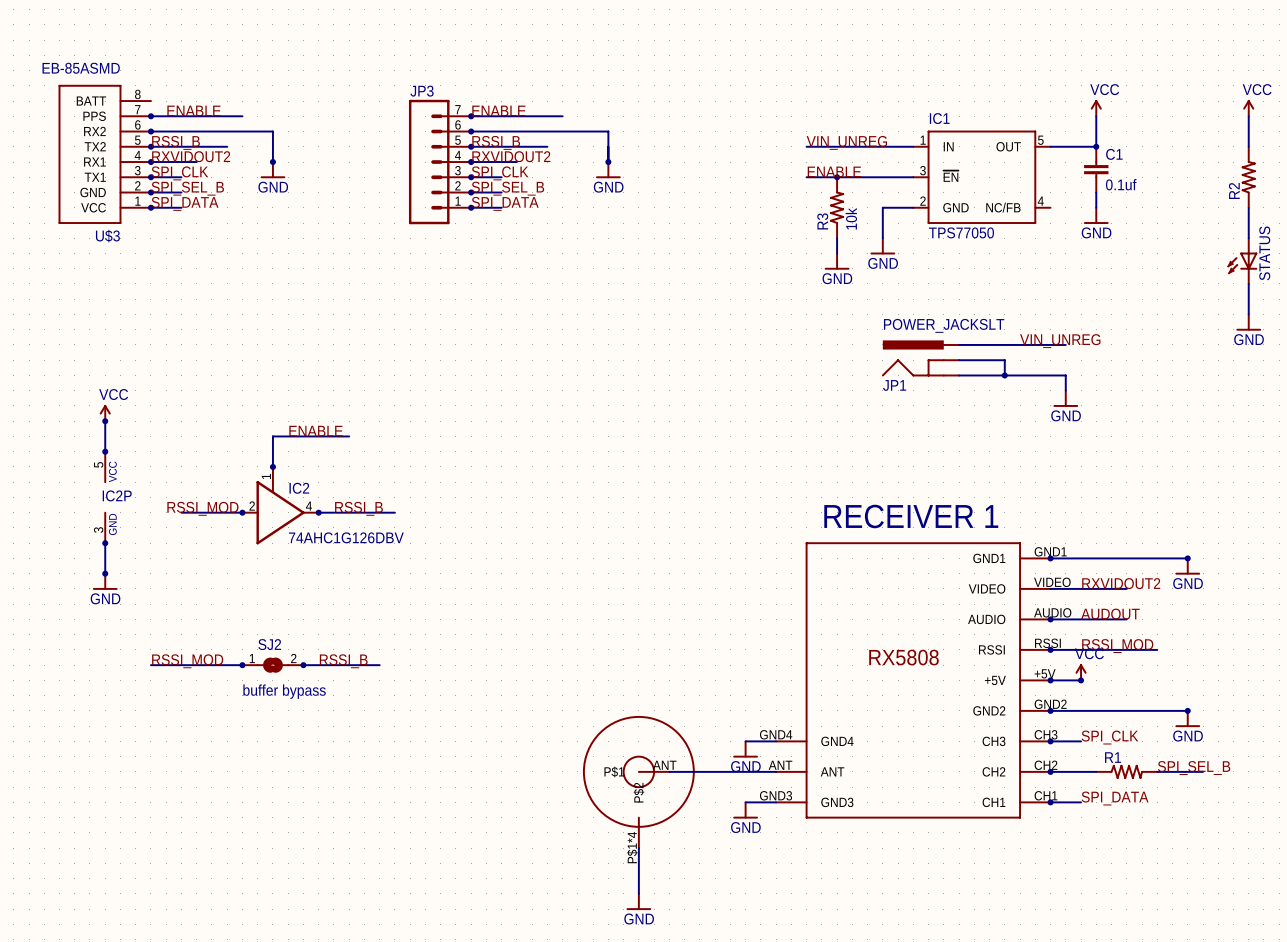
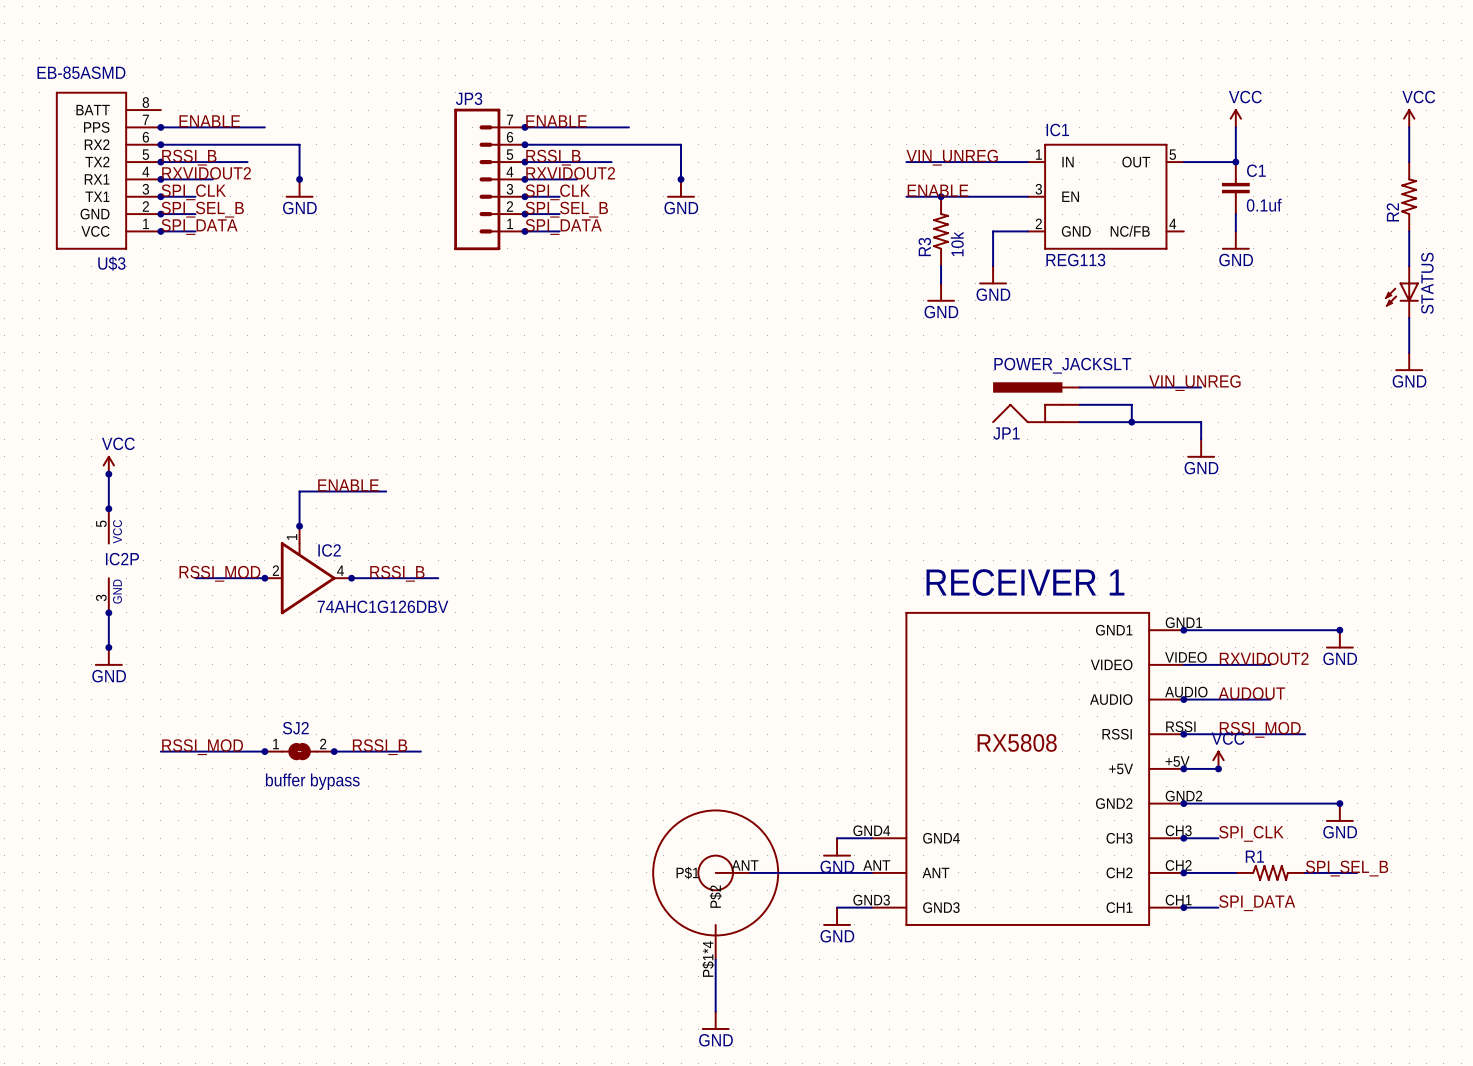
IC1 pin name: ~{EN} (950, 176) -> EN (1070, 196)
IC1 value: TPS77050 (961, 232) -> REG113 (1075, 260)

